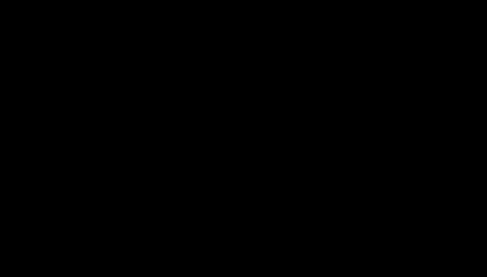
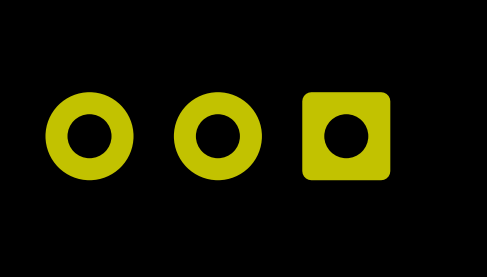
part: none -> (217, 136)

